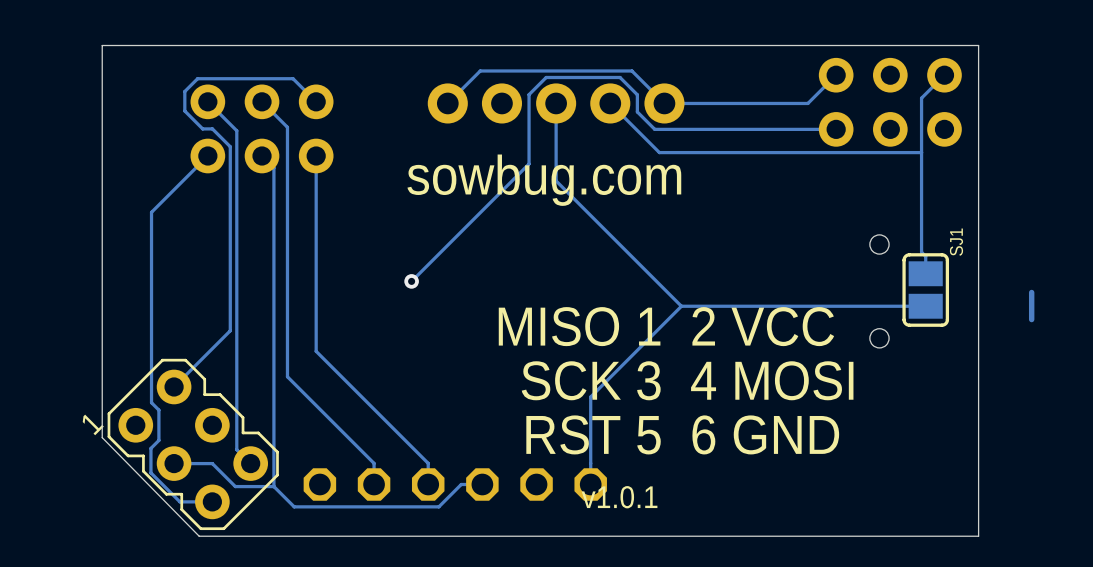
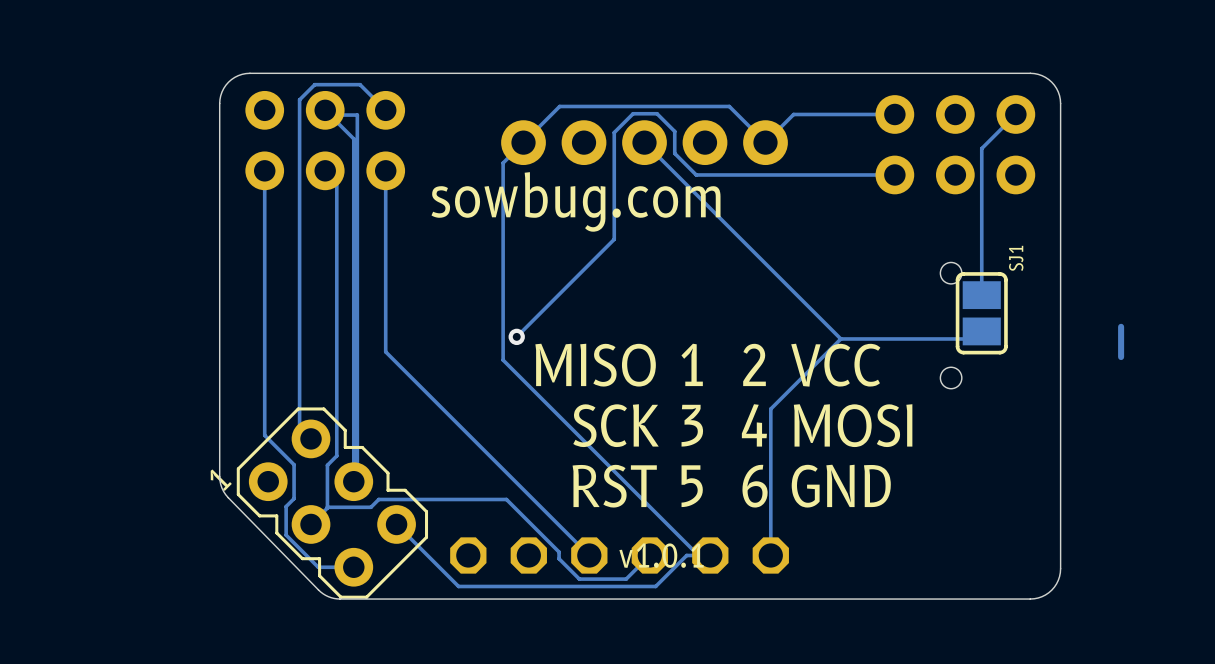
track: (836, 75) (807, 103) (664, 103) (631, 70) (480, 70) (447, 103) -> none
track: (944, 75) (921, 98) (921, 252) (925, 256) (925, 273) -> none
track: none -> (325, 110) (353, 138) (353, 481) (357, 478) (357, 115) (327, 115) (325, 110)
track: none -> (385, 110) (360, 84) (314, 84) (299, 99) (299, 427) (311, 438) (304, 432)
track: (207, 101) (236, 130) (236, 449) (250, 463) -> none
track: (262, 101) (287, 127) (287, 376) (374, 463) (374, 484) -> none
track: (316, 101) (293, 78) (197, 78) (184, 91) (184, 111) (202, 128) (212, 128) (230, 146) (230, 330) (174, 386) -> none
track: none -> (894, 114) (793, 114) (765, 142) (729, 106) (559, 106) (503, 163) (503, 360) (698, 555)
part position: (890, 102) -> (955, 144)
track: none -> (1015, 114) (981, 148) (981, 295)
track: (556, 103) (556, 180) (681, 306) -> none
part position: (556, 103) -> (644, 142)
track: (610, 103) (659, 152) (921, 152) -> none
track: none -> (644, 142) (840, 338)
part position: (262, 128) -> (325, 140)
track: (836, 129) (654, 129) (637, 111) (637, 94) (620, 77) (546, 77) (529, 94) (529, 163) (411, 281) -> none
track: none -> (264, 170) (264, 435) (294, 464) (294, 498) (286, 506) (286, 535) (318, 567) (353, 567) (349, 568) (349, 567)
track: none -> (325, 170) (336, 182) (336, 455) (327, 465) (327, 508) (311, 523)
track: none -> (385, 170) (385, 351) (589, 555)
track: (207, 156) (151, 212) (151, 402) (158, 410) (158, 440) (150, 448) (150, 472) (179, 501) (212, 501) -> none
track: (262, 156) (273, 167) (273, 486) -> none
track: (316, 156) (316, 351) (428, 463) (428, 484) -> none
track: none -> (894, 174) (696, 174) (674, 153) (674, 131) (657, 113) (633, 113) (614, 132) (614, 239) (516, 336)
via position: (411, 281) -> (516, 336)
SJ1 position: (925, 290) -> (981, 313)
track: none -> (981, 331) (974, 338) (840, 338)
track: none -> (840, 338) (770, 409) (770, 555)
track: (681, 306) (590, 397) (590, 484) -> none
track: (925, 306) (681, 306) -> none
part position: (193, 444) -> (332, 503)
track: none -> (327, 507) (370, 507) (378, 499) (506, 499) (559, 552) (559, 558) (579, 579) (626, 579) (649, 555)
track: (174, 463) (212, 463) (235, 486) (273, 486) -> none
track: none -> (396, 524) (458, 586) (655, 586) (686, 555) (710, 555)
part position: (455, 484) -> (619, 555)
track: (482, 484) (461, 484) (438, 506) (294, 506) (273, 486) -> none
board edge: (950, 536) (978, 536) (978, 45) (102, 45) (102, 437) (199, 536) (332, 536) -> (1030, 599) (1041, 596) (1051, 590) (1058, 580) (1060, 568) (1060, 103) (1056, 88) (1048, 79) (1038, 74) (1030, 73) (246, 73) (234, 77) (225, 85) (220, 95) (219, 103) (219, 480) (228, 497) (318, 589) (328, 596) (340, 599)

